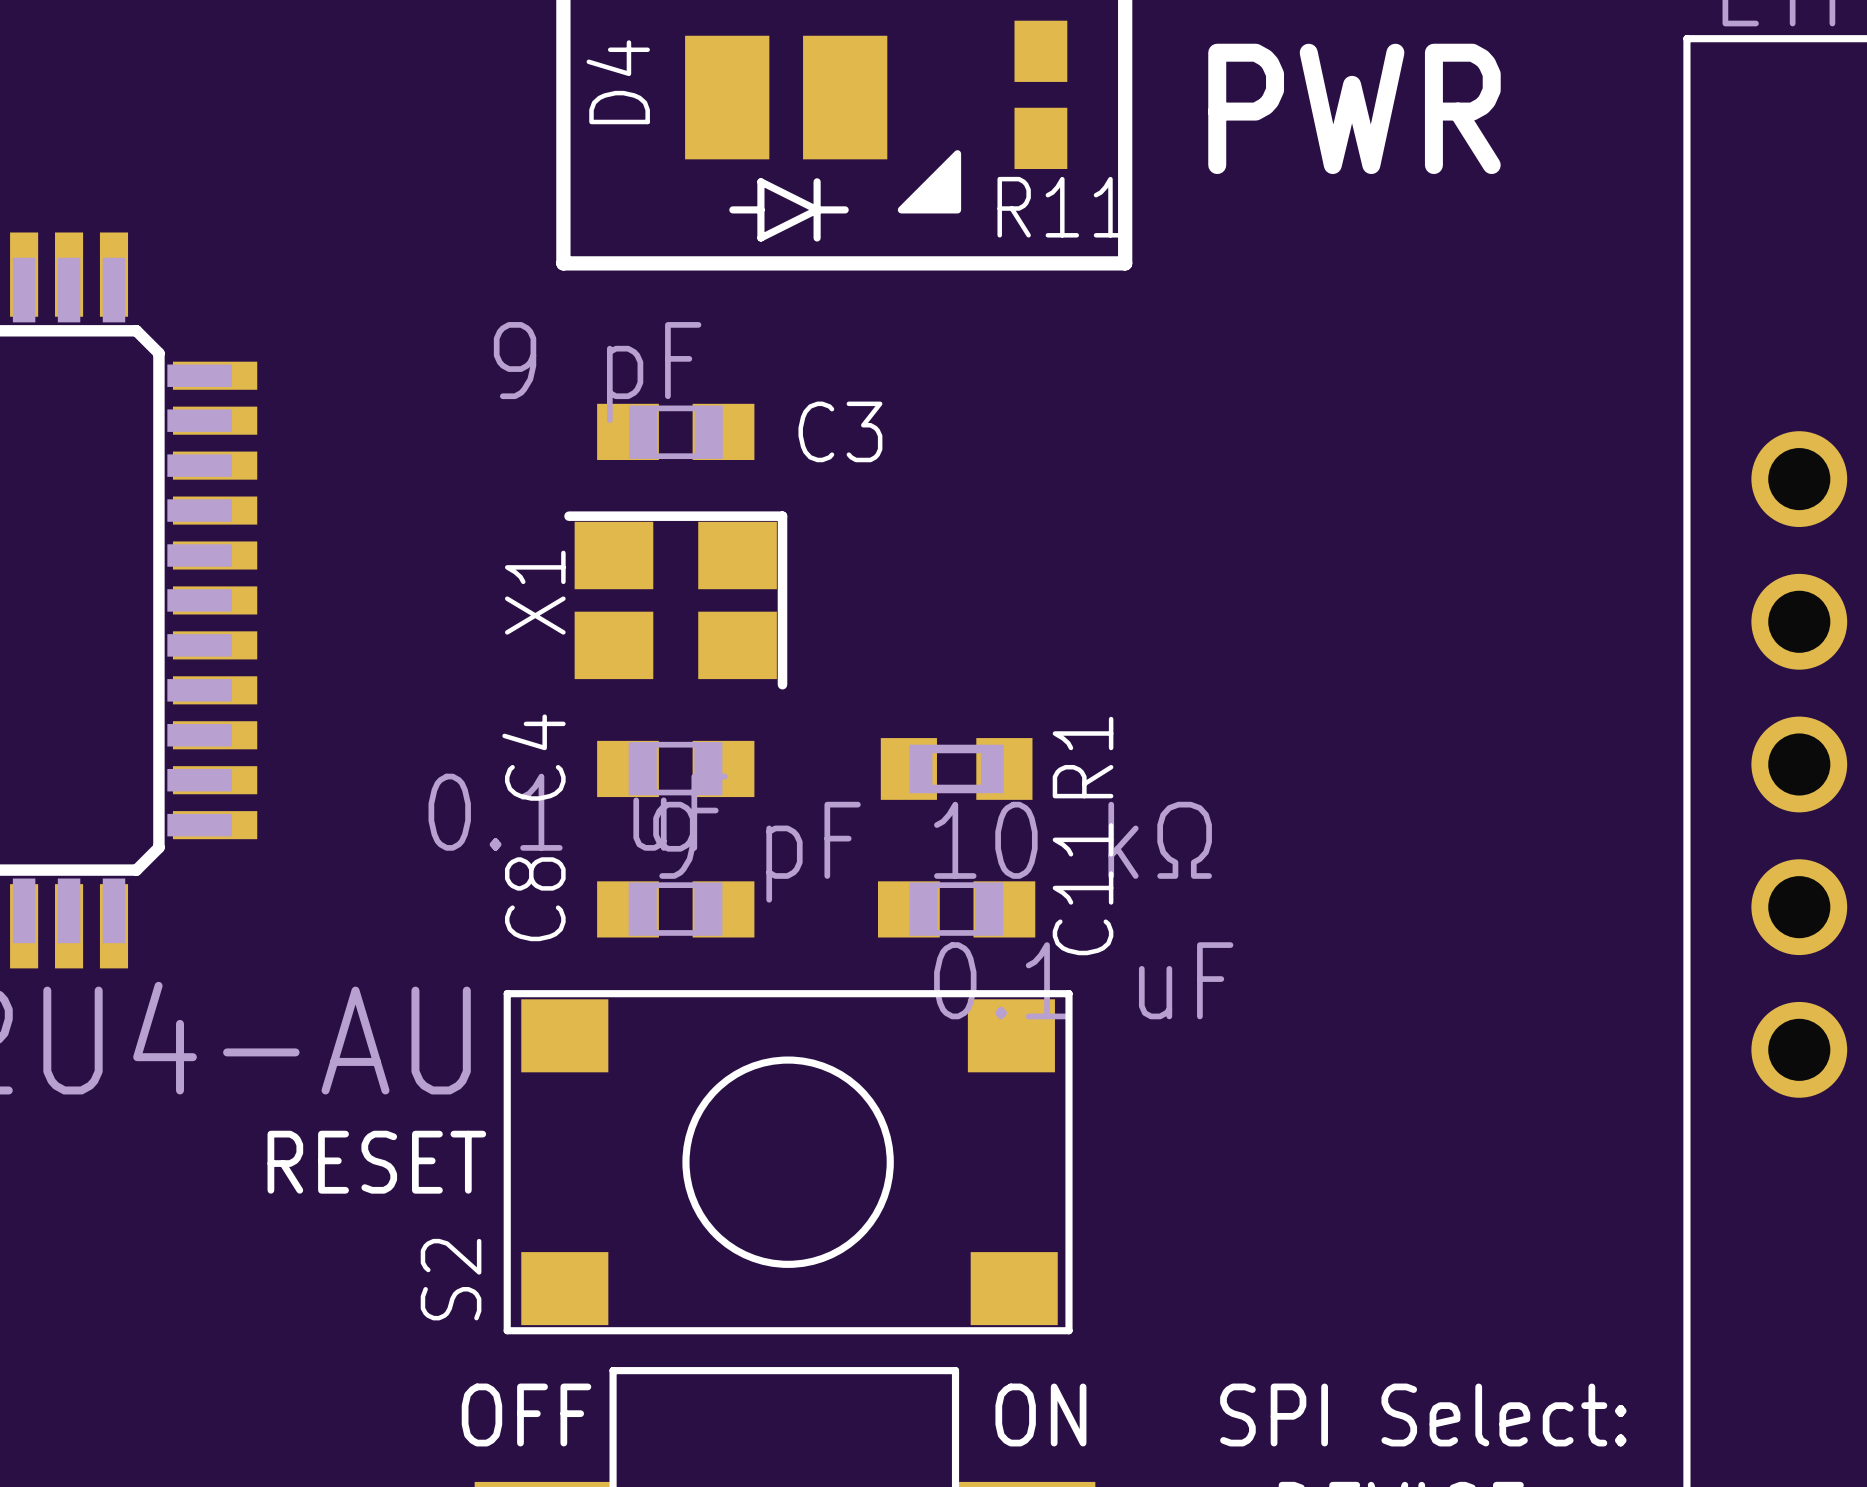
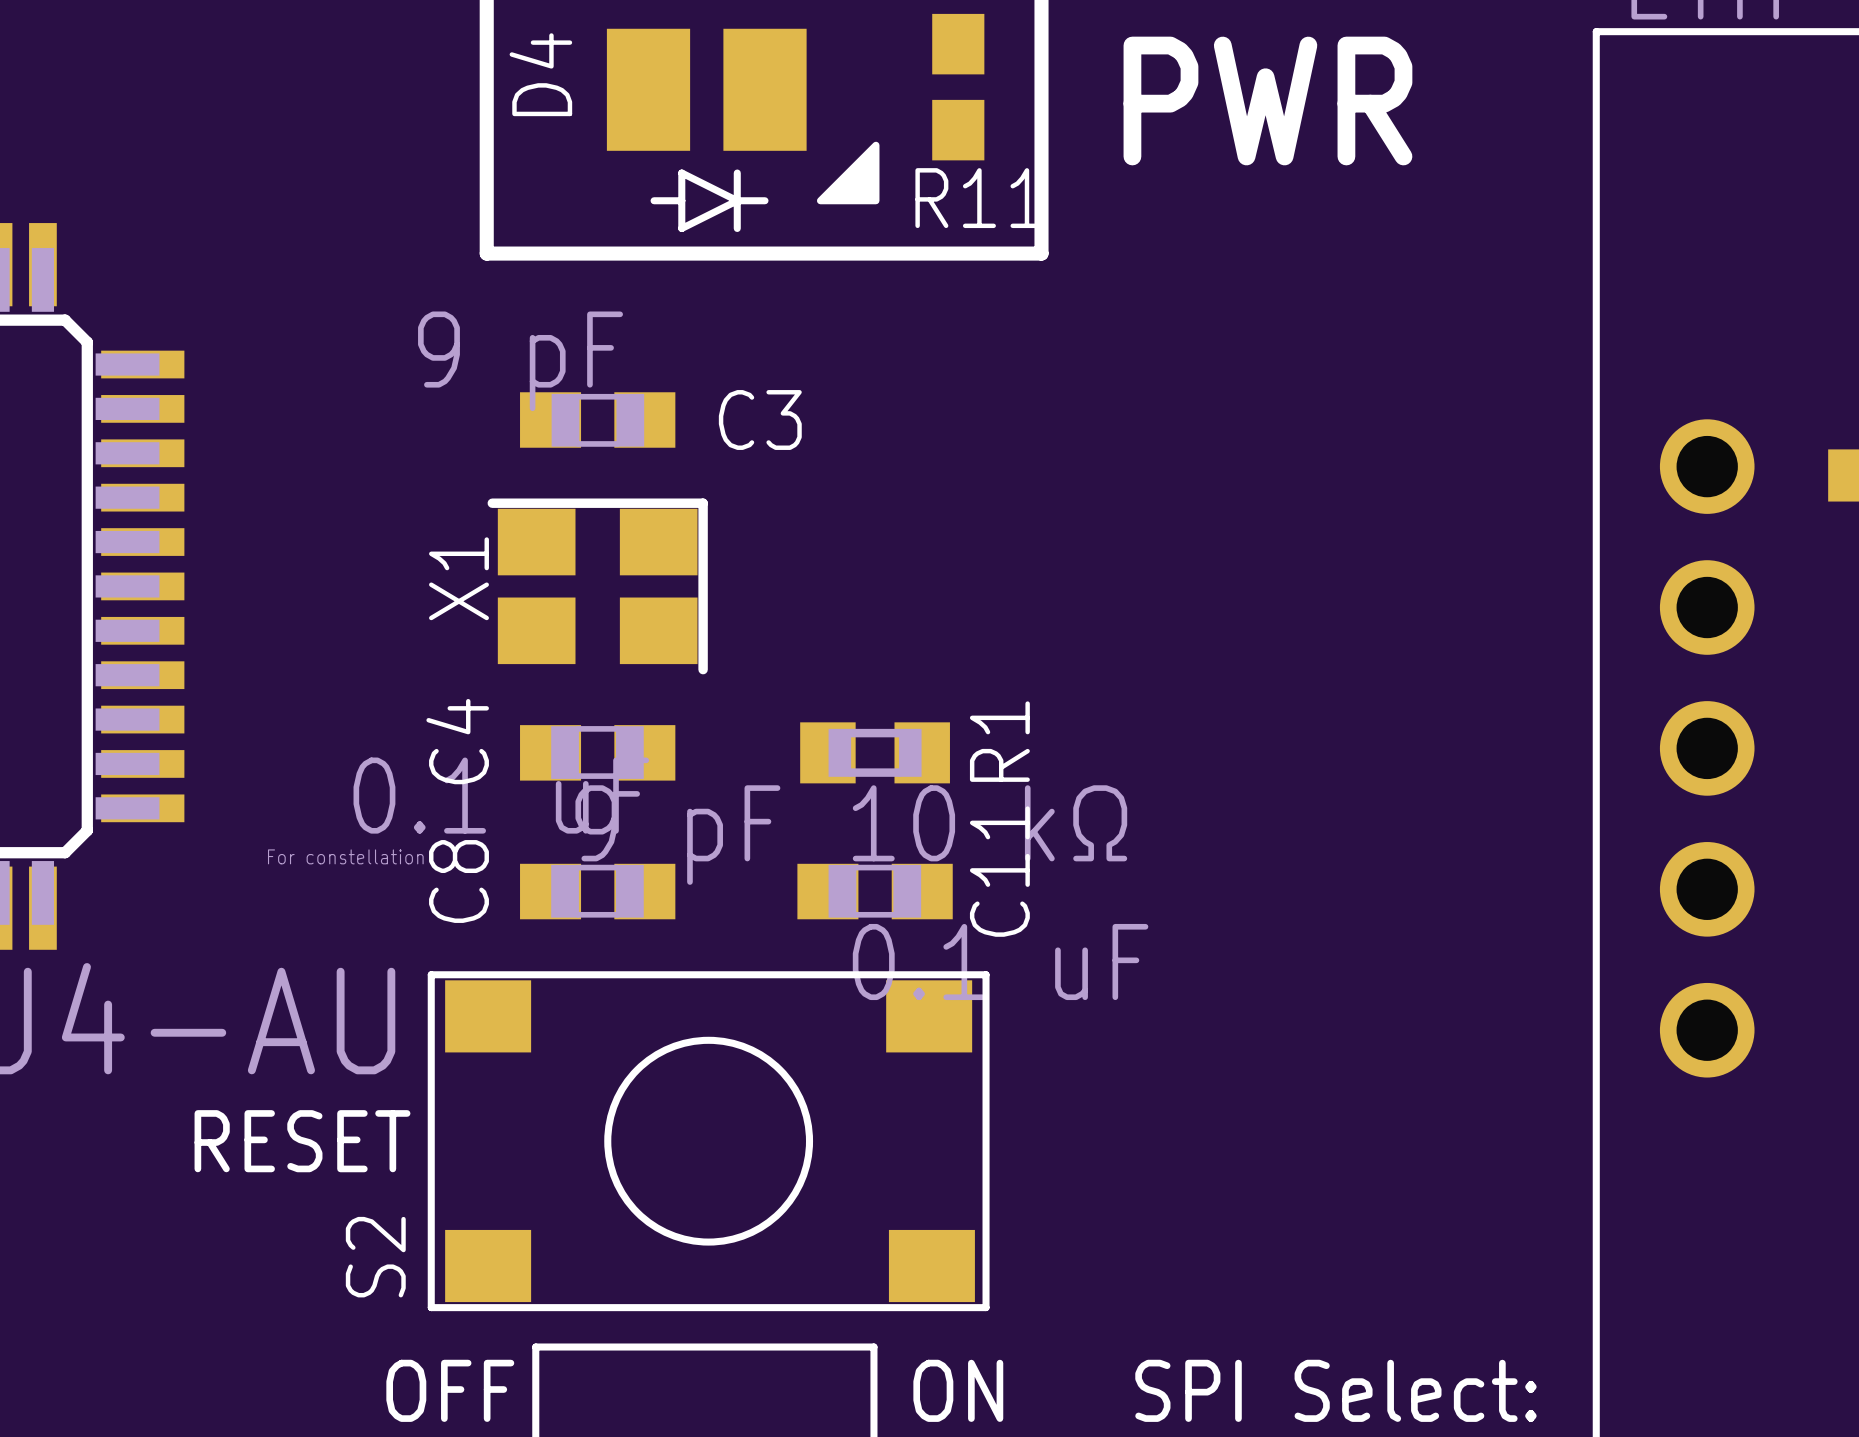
text: none -> For constellation (345, 856)

